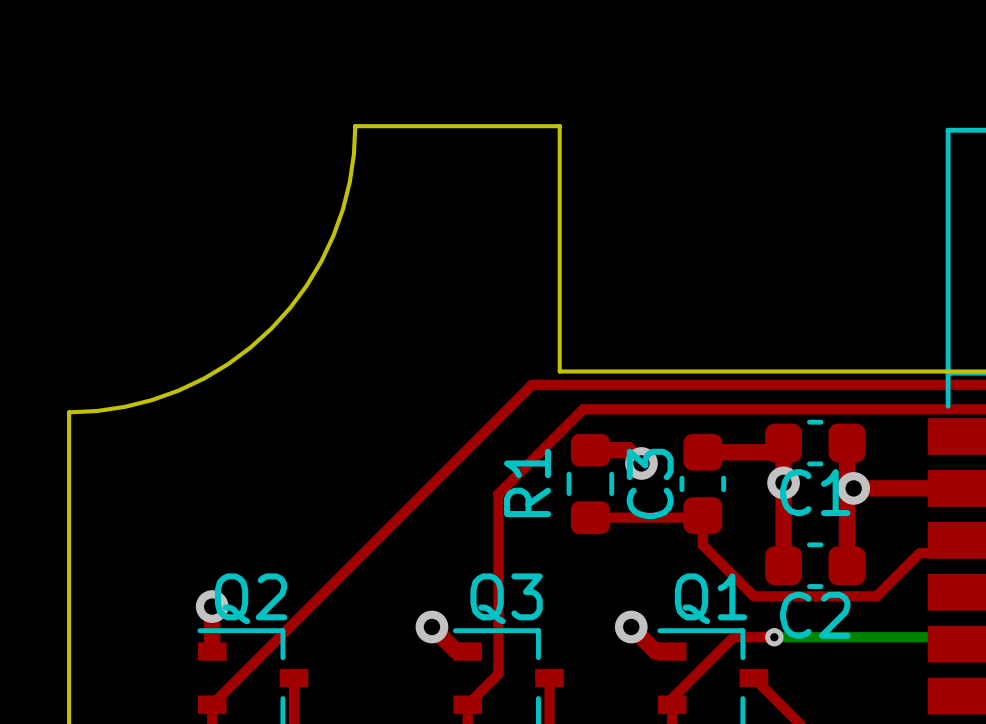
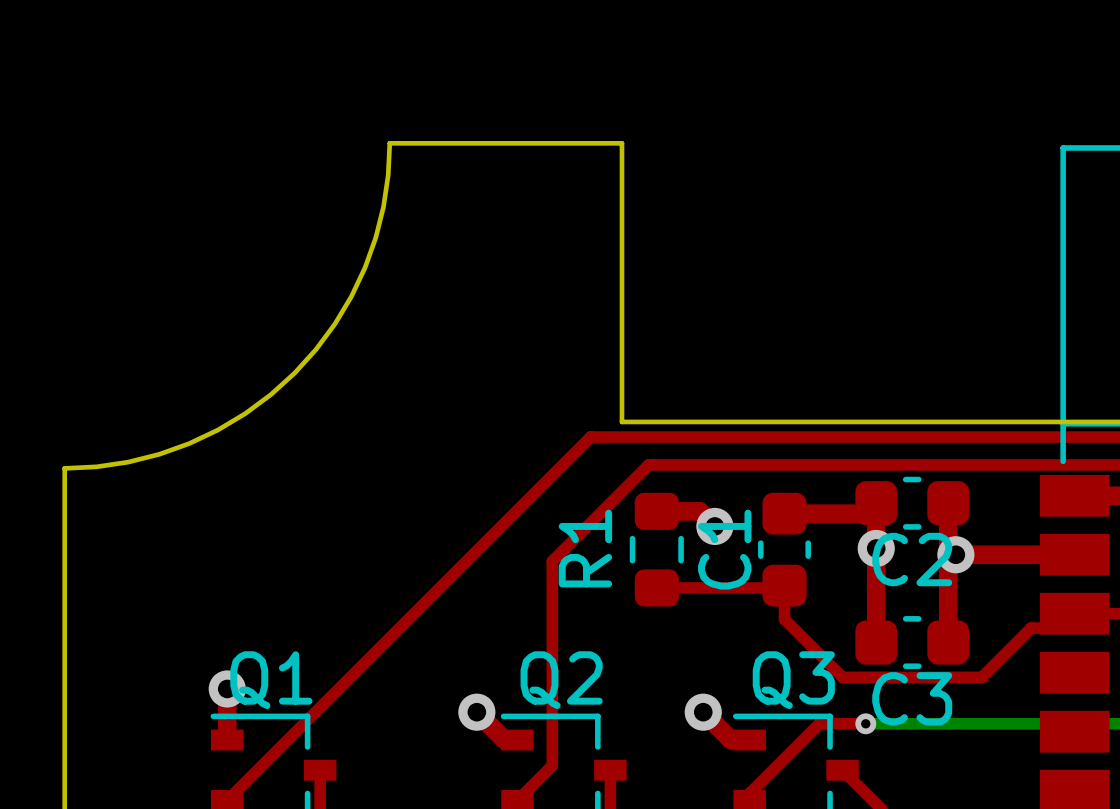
C3 name: C3 (650, 483) -> C1 (724, 549)
C1 name: C1 (815, 492) -> C2 (912, 559)
Q2 name: Q2 (251, 598) -> Q1 (271, 680)
Q3 name: Q3 (506, 598) -> Q2 (561, 680)
Q1 name: Q1 (710, 598) -> Q3 (793, 680)
C2 name: C2 (815, 615) -> C3 (912, 698)

